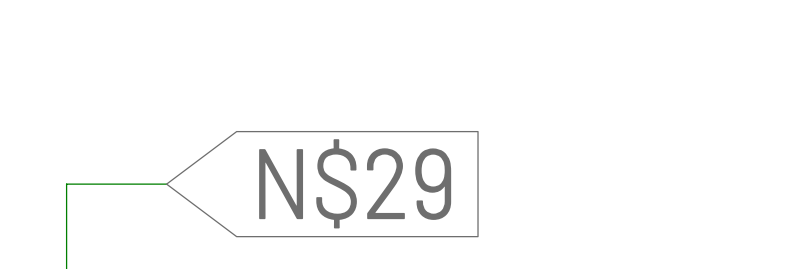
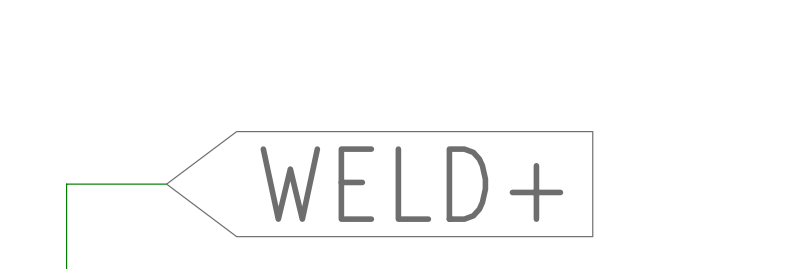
global label: N$29 (355, 183) -> WELD+ (411, 184)

